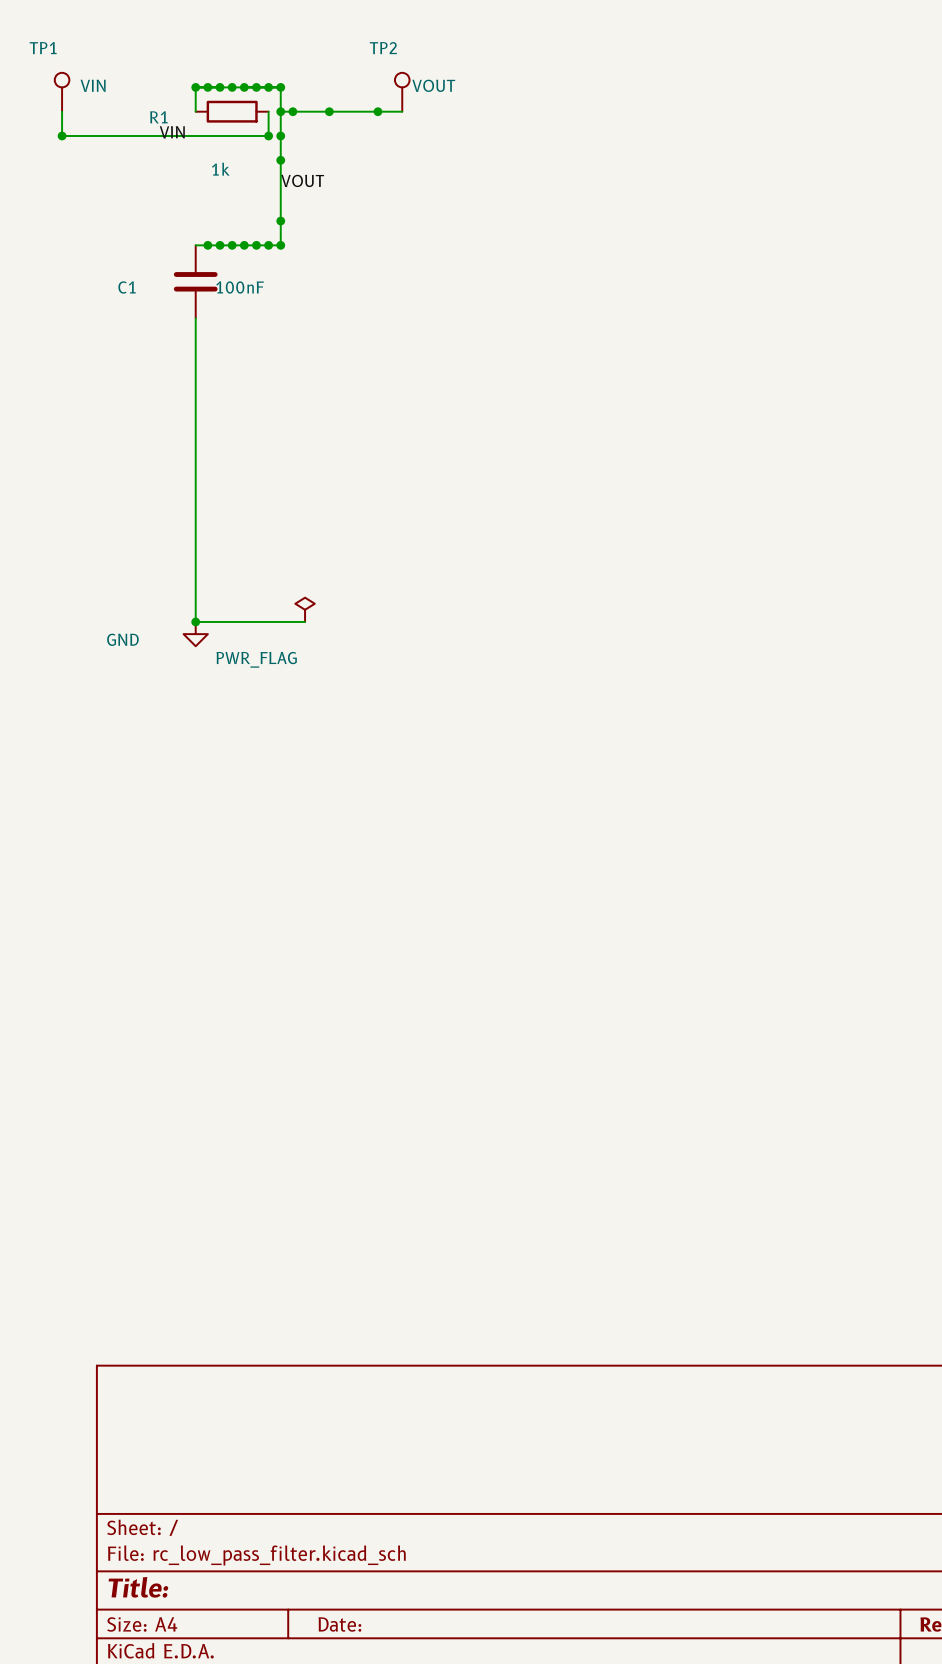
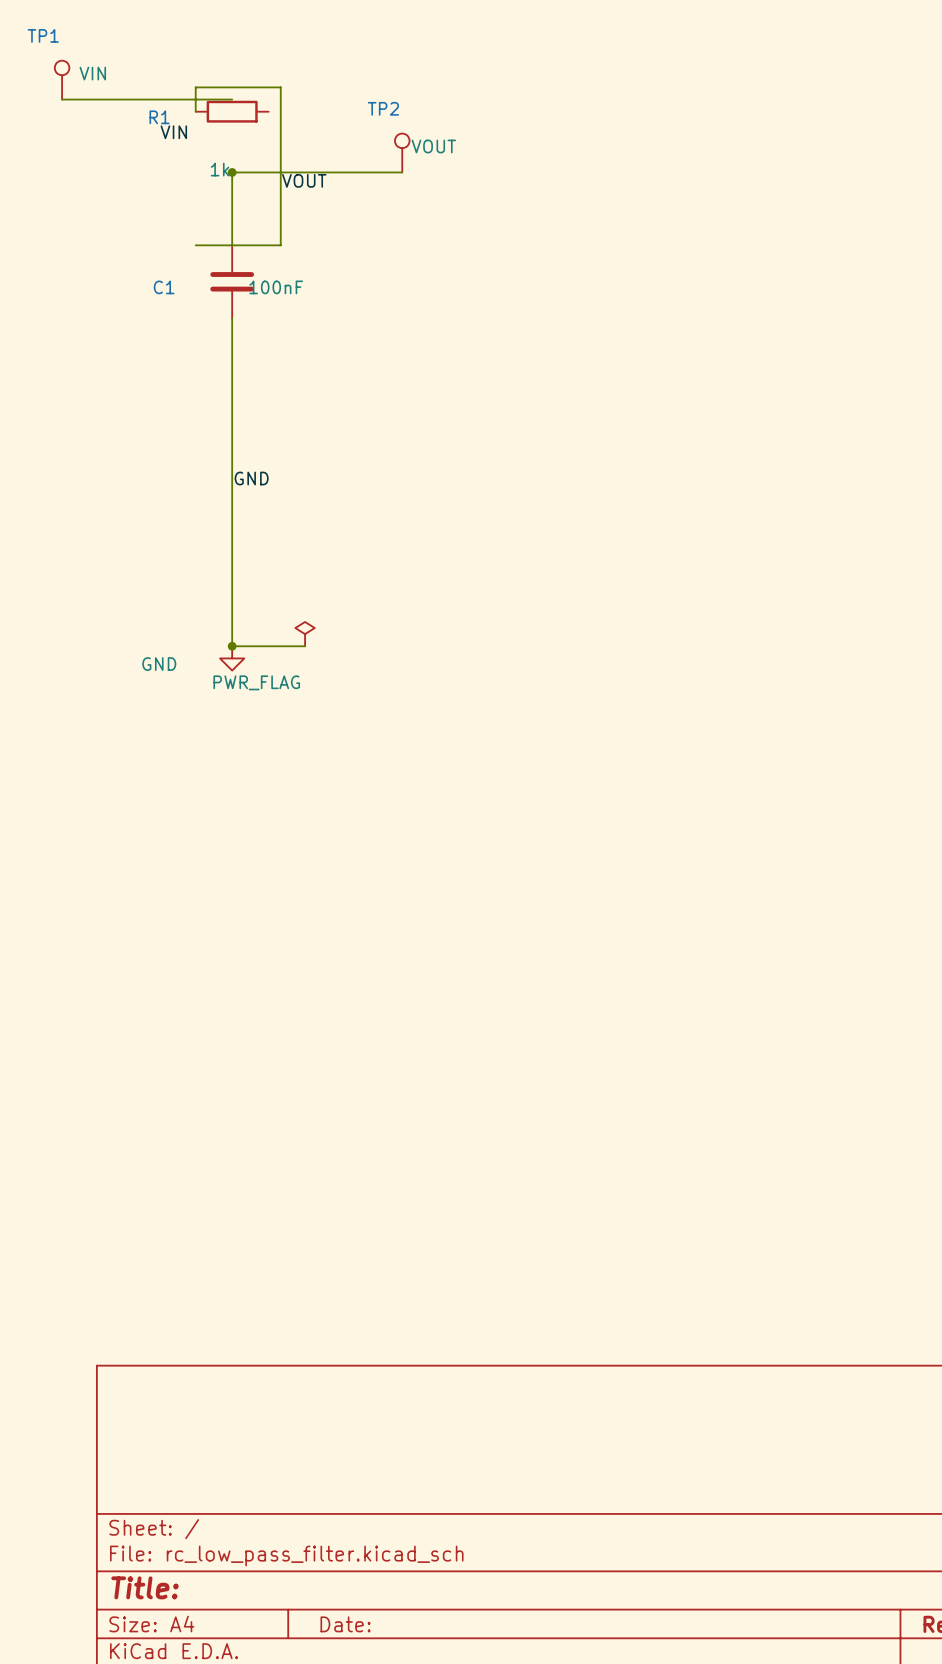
junction: (195, 87) -> none
junction: (207, 87) -> none
junction: (220, 87) -> none
junction: (232, 87) -> none
junction: (244, 87) -> none
junction: (256, 87) -> none
junction: (268, 87) -> none
junction: (280, 87) -> none
TP1 position: (62, 92) -> (62, 80)
TP2 position: (402, 92) -> (402, 153)
wire: none -> (62, 99) (232, 99)
wire: (62, 111) (62, 136) (268, 136) (268, 111) -> none
wire: (280, 111) (402, 111) -> none
junction: (280, 111) -> none
junction: (292, 111) -> none
junction: (329, 111) -> none
junction: (377, 111) -> none
junction: (62, 136) -> none
junction: (268, 136) -> none
junction: (280, 136) -> none
junction: (280, 160) -> none
junction: none -> (232, 172)
wire: none -> (402, 172) (232, 172) (232, 245)
junction: (280, 221) -> none
junction: (207, 245) -> none
junction: (220, 245) -> none
junction: (232, 245) -> none
junction: (244, 245) -> none
junction: (256, 245) -> none
junction: (268, 245) -> none
junction: (280, 245) -> none
C1 position: (195, 281) -> (232, 281)
wire: (195, 318) (195, 621) (305, 621) -> none
wire: none -> (232, 318) (232, 646) (305, 646)
label: none -> GND (251, 478)
power symbol position: PWR_FLAG (305, 609) -> PWR_FLAG (305, 634)
junction position: (195, 621) -> (232, 646)
power symbol position: GND (195, 634) -> GND (232, 658)

